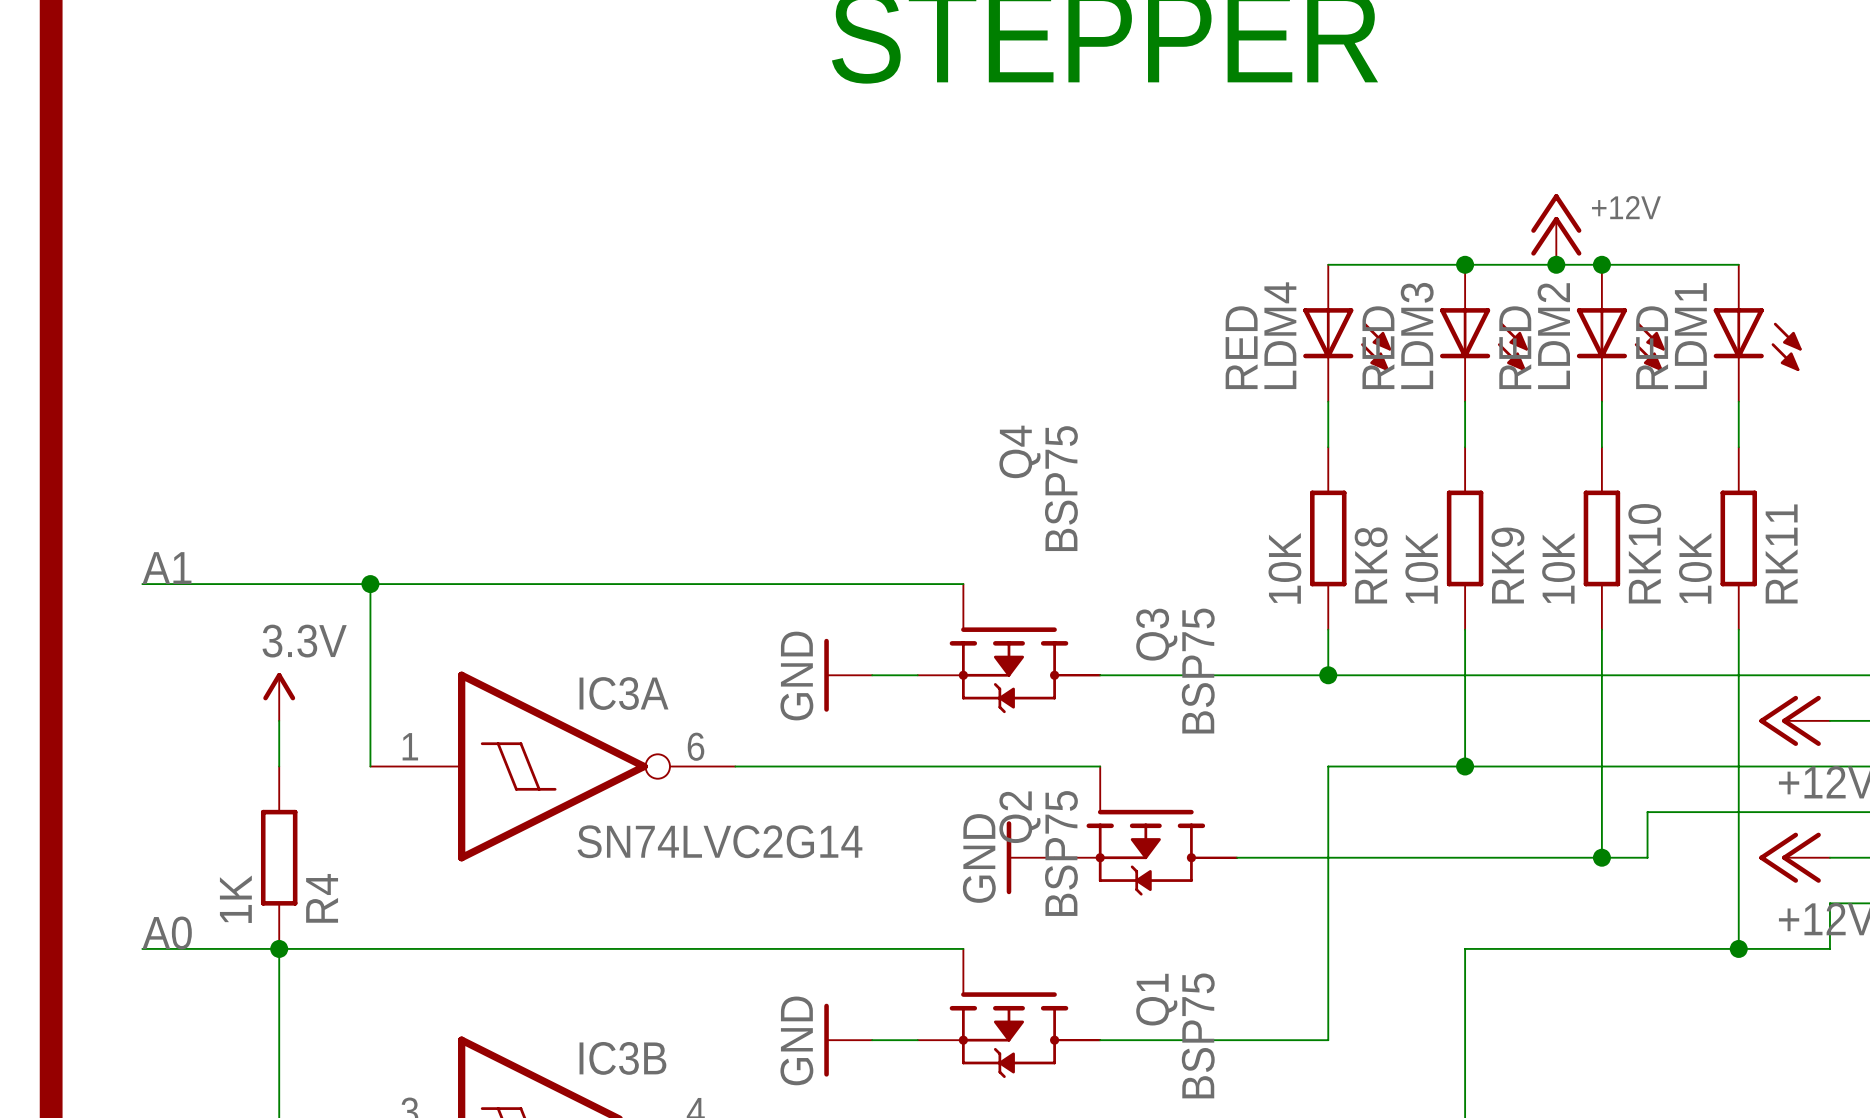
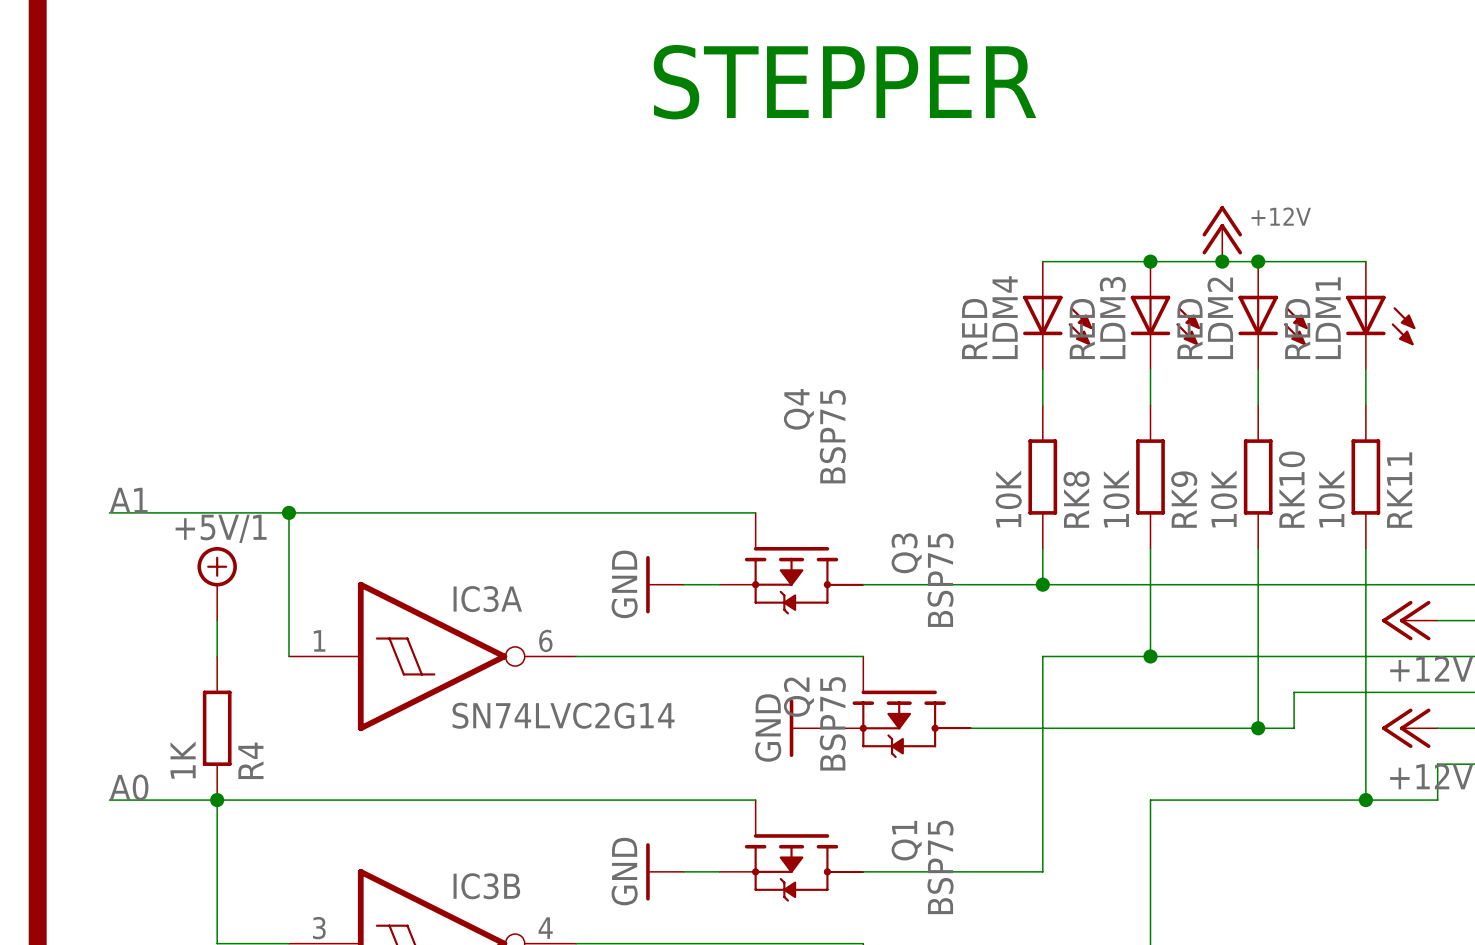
power symbol: none -> +5V/1 (217, 583)
power symbol: 3.3V (279, 696) -> none

